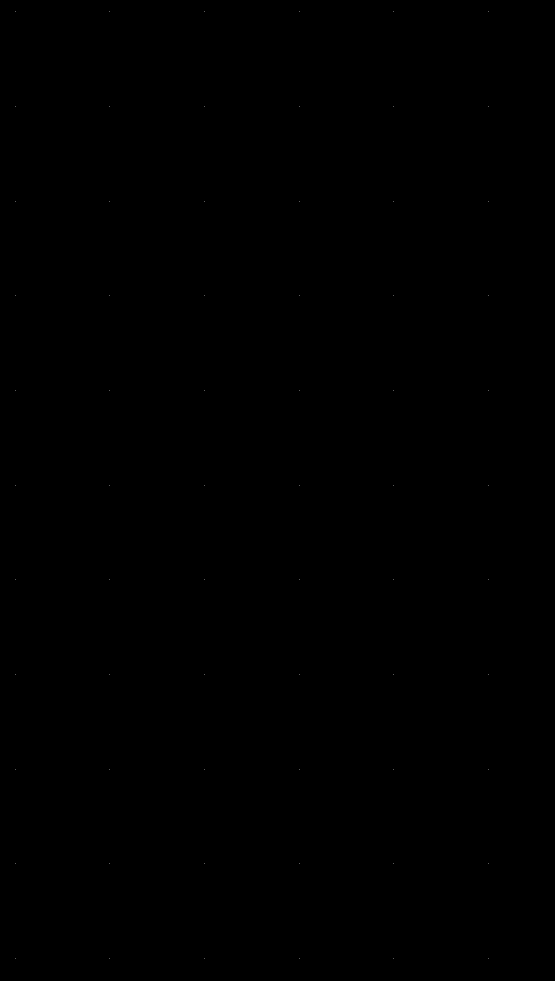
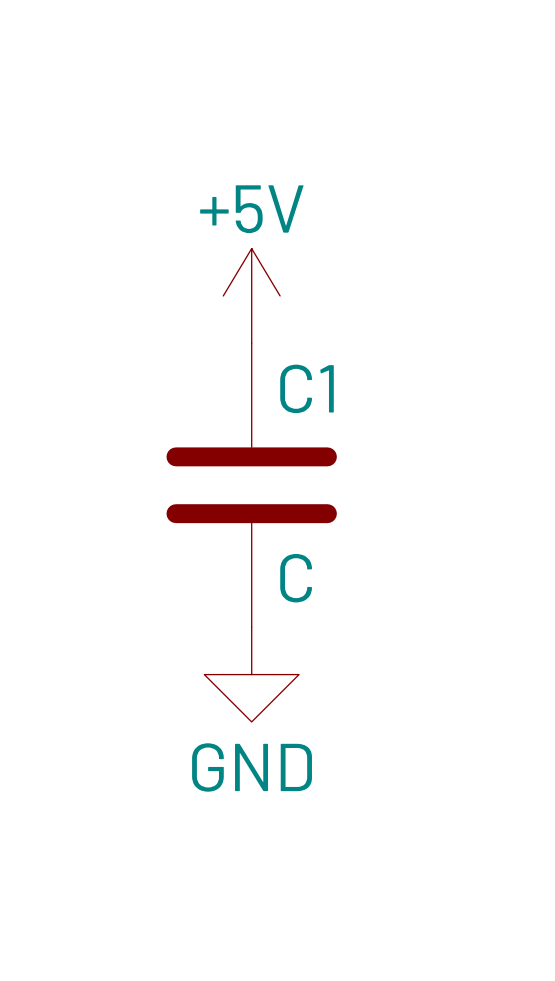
power symbol: none -> +5V (251, 295)
C1: none -> C (251, 485)
power symbol: none -> GND (251, 674)

